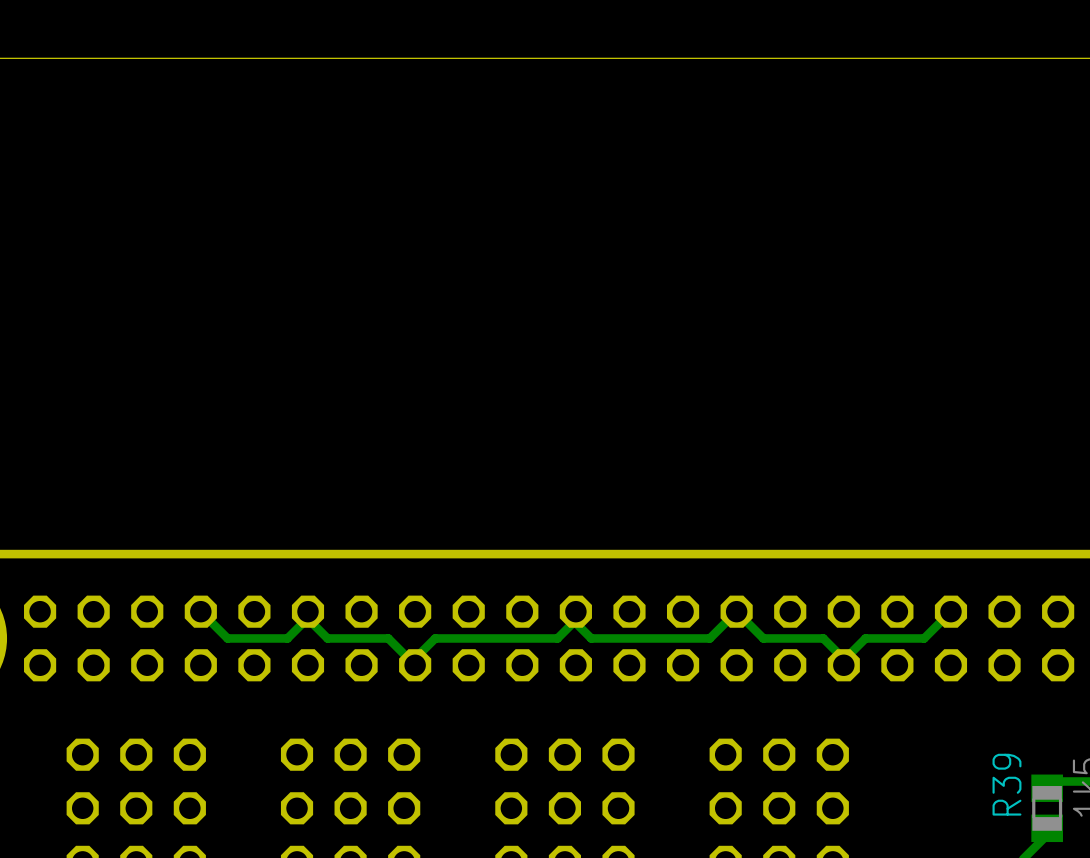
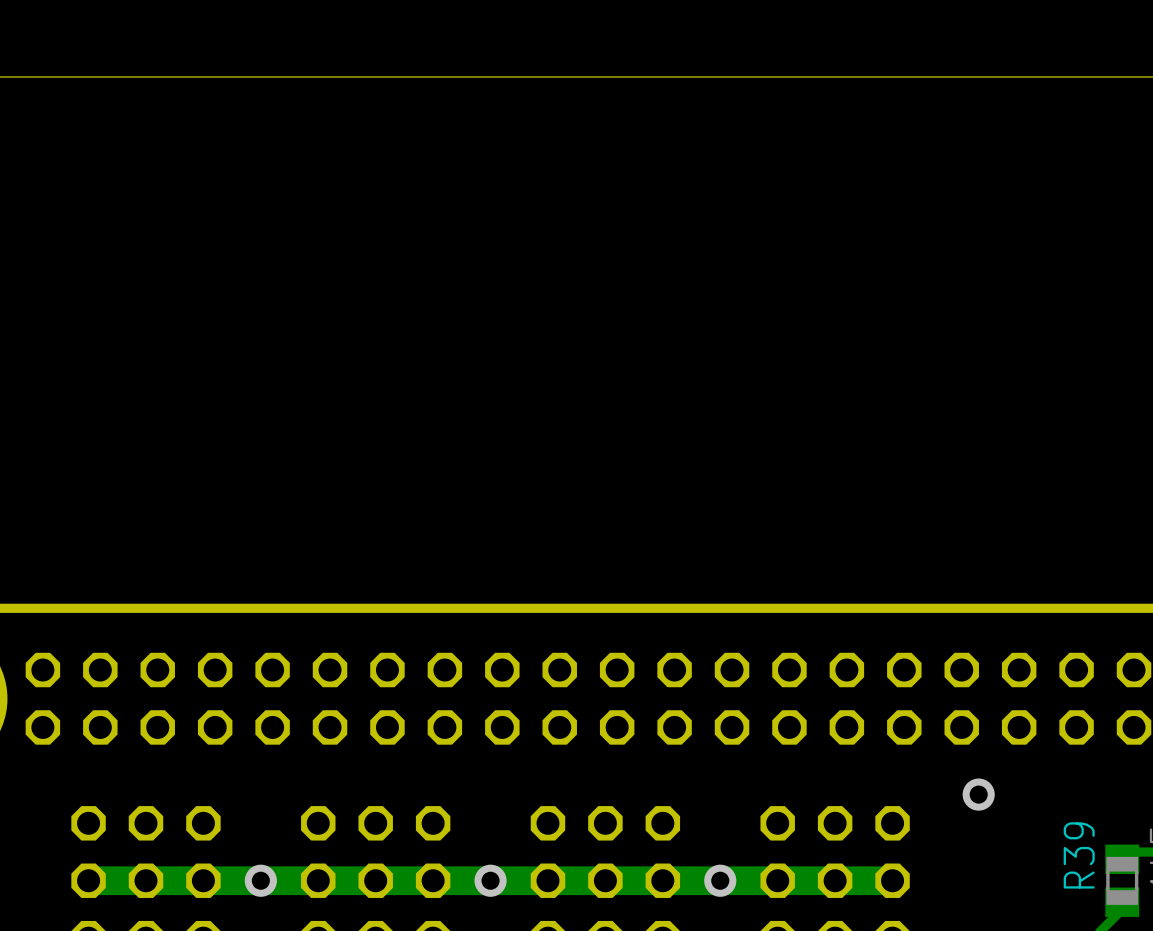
track: (200, 611) (227, 638) (287, 638) (307, 618) -> none
track: (307, 611) (307, 618) (327, 638) (388, 638) (415, 665) (415, 658) (435, 638) (557, 638) (574, 621) -> none
track: (575, 611) (575, 623) (591, 638) (709, 638) (736, 611) (763, 638) (823, 638) (843, 658) (843, 665) -> none
track: (950, 611) (924, 638) (865, 638) (843, 660) -> none
via: none -> (978, 794)
via: none -> (260, 880)
via: none -> (490, 880)
via: none -> (720, 880)
track: none -> (892, 880) (88, 880)

